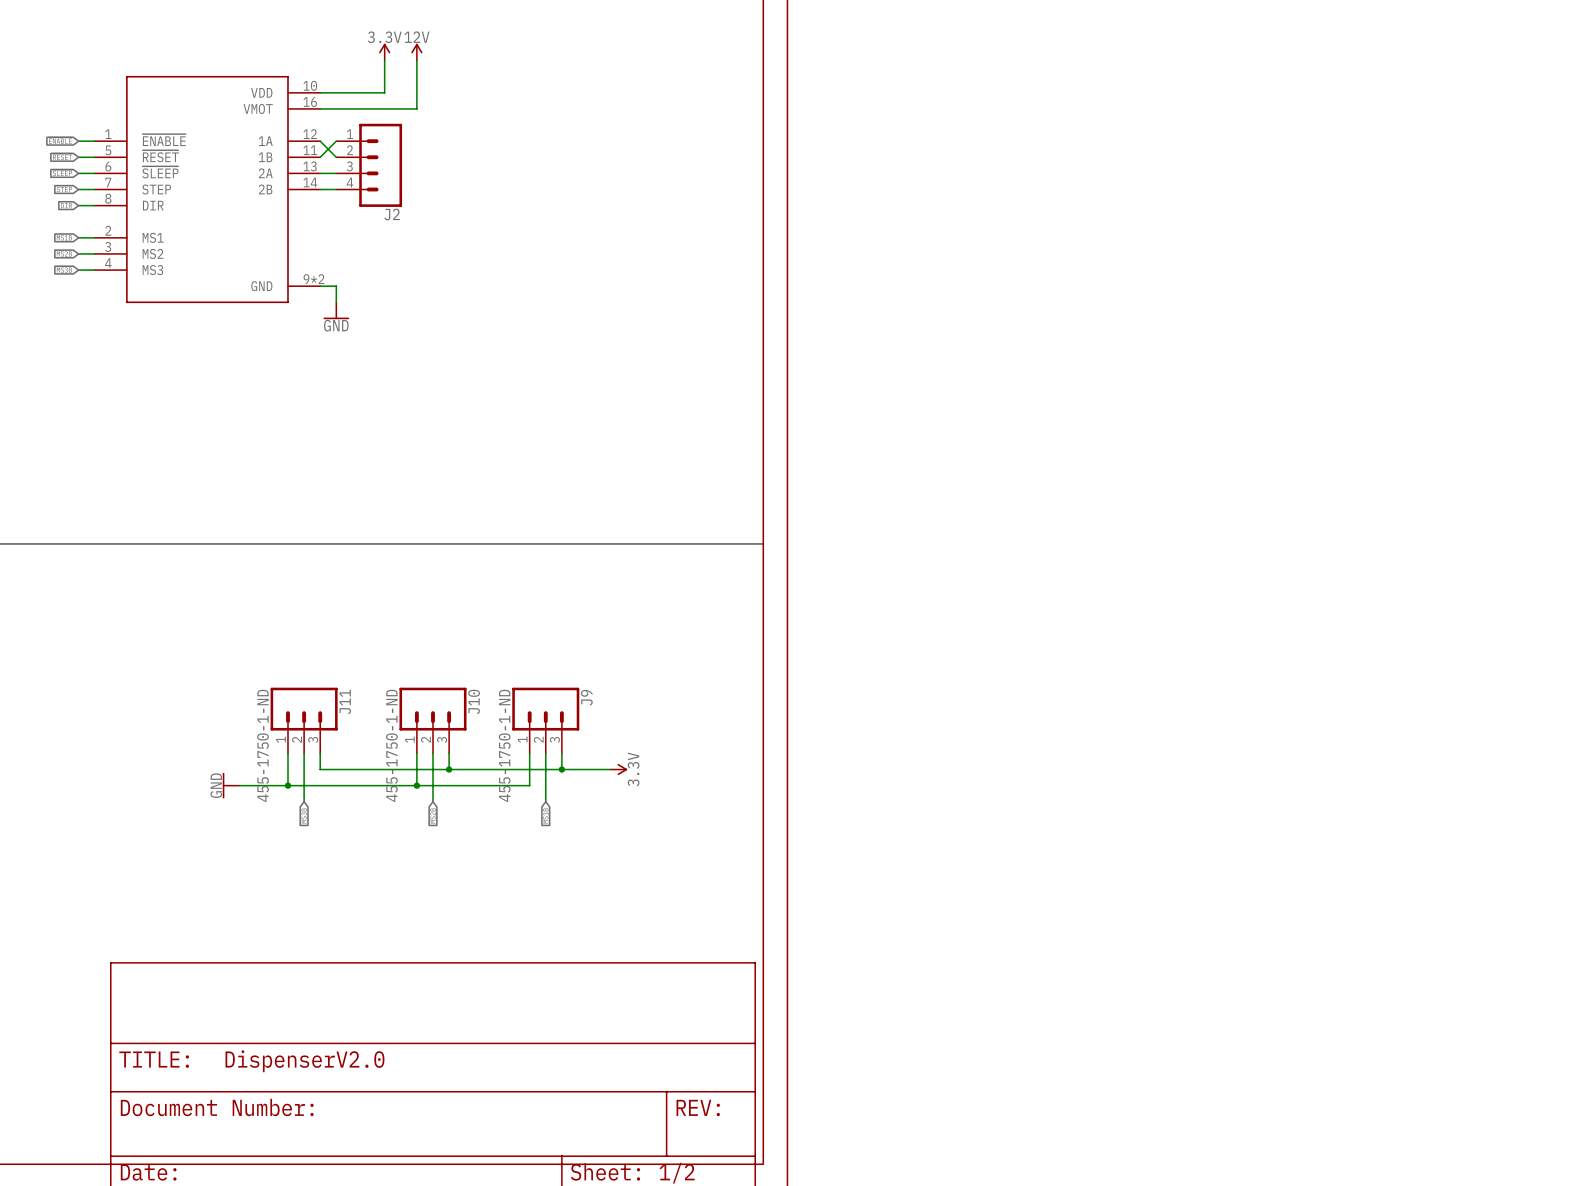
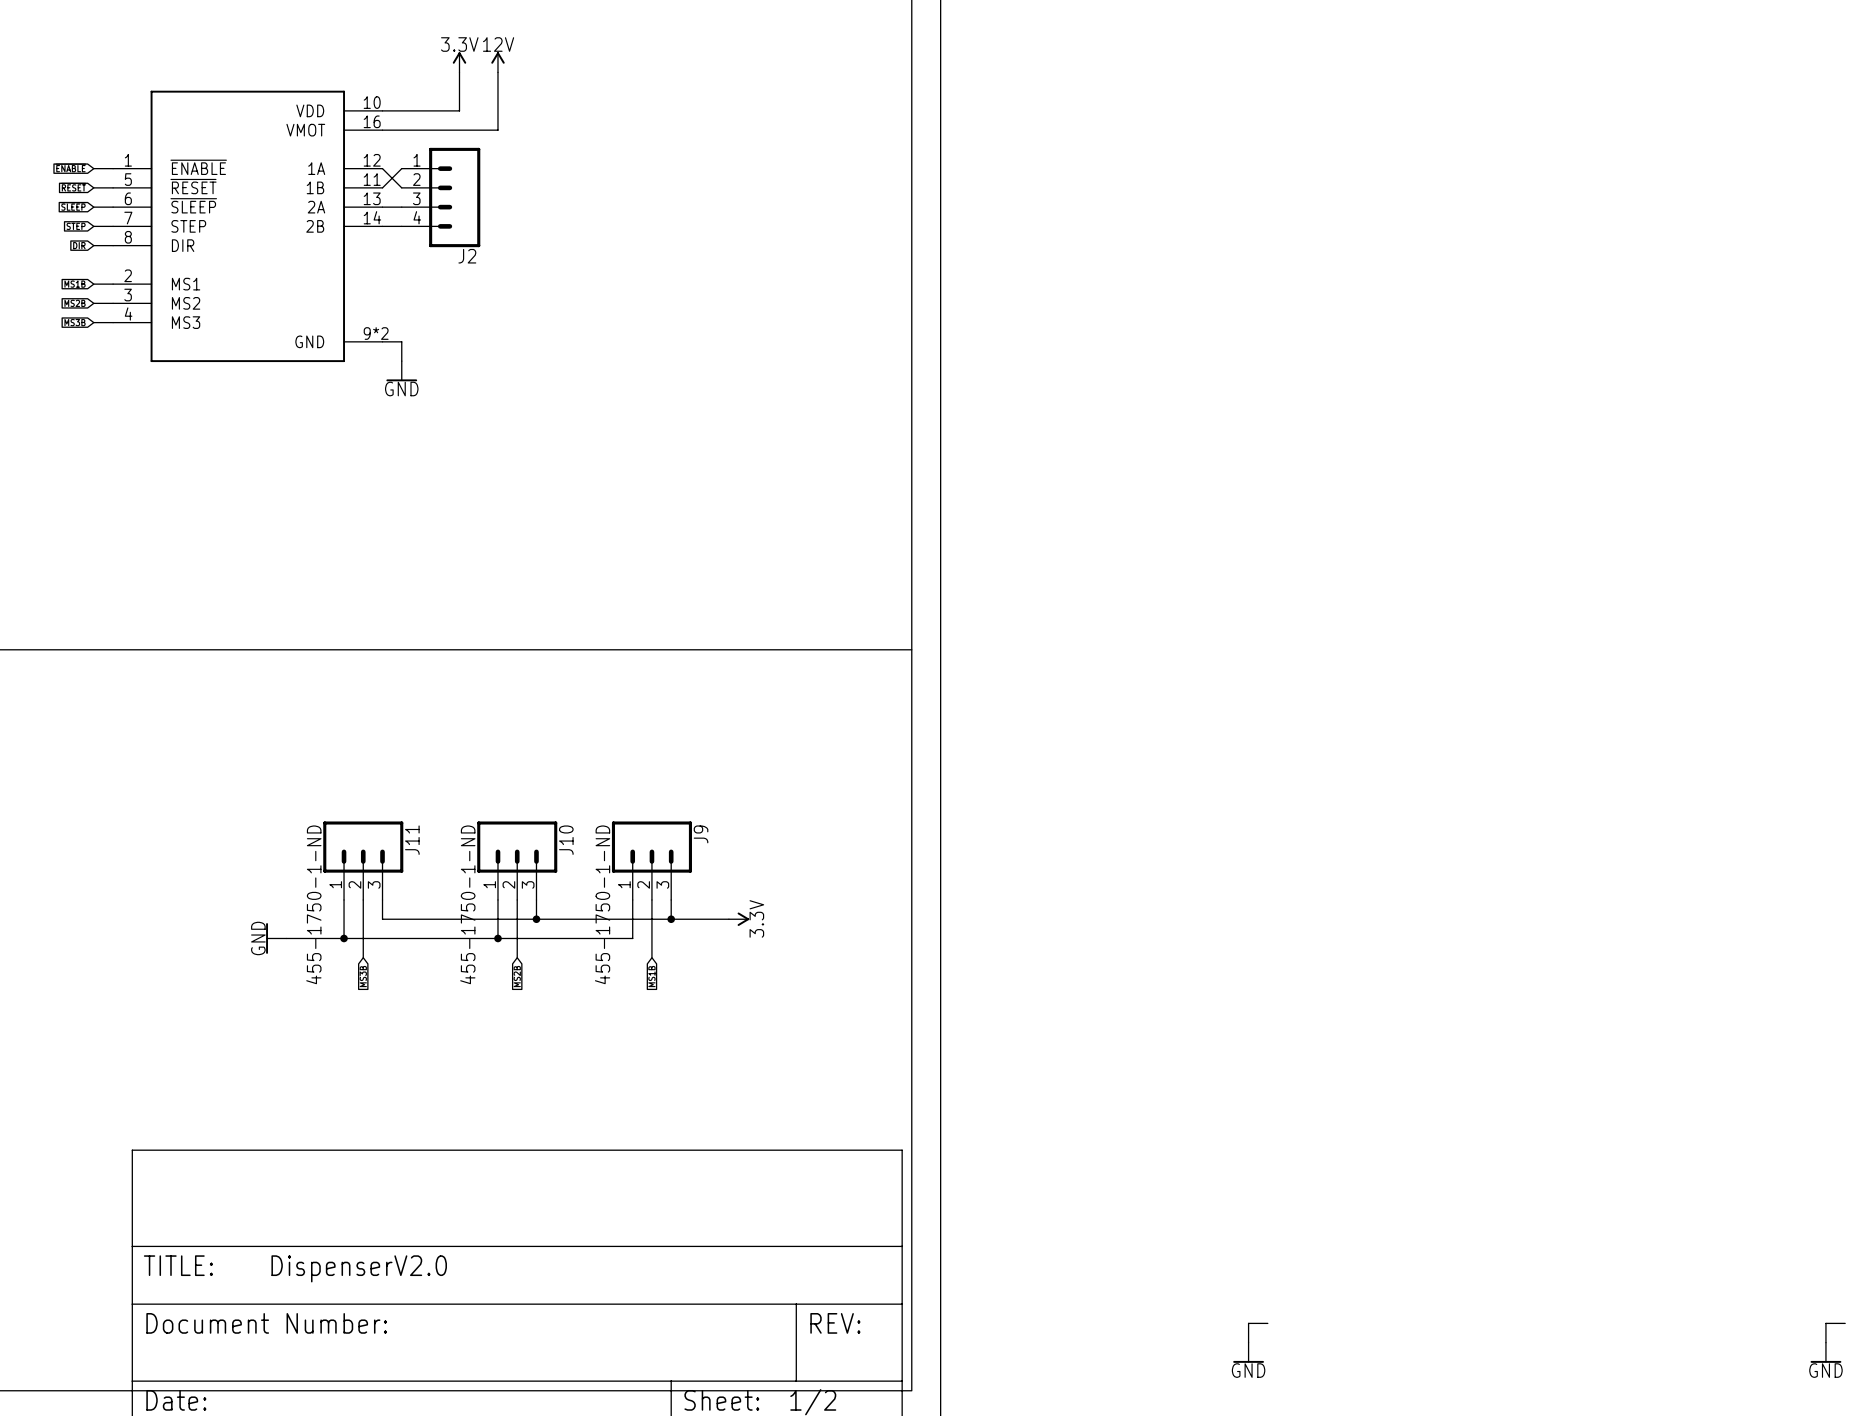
wire: none -> (1267, 1323) (1248, 1323) (1248, 1342)
wire: none -> (1845, 1323) (1825, 1323) (1825, 1342)
power symbol: none -> GND (1248, 1352)
power symbol: none -> GND (1825, 1352)

